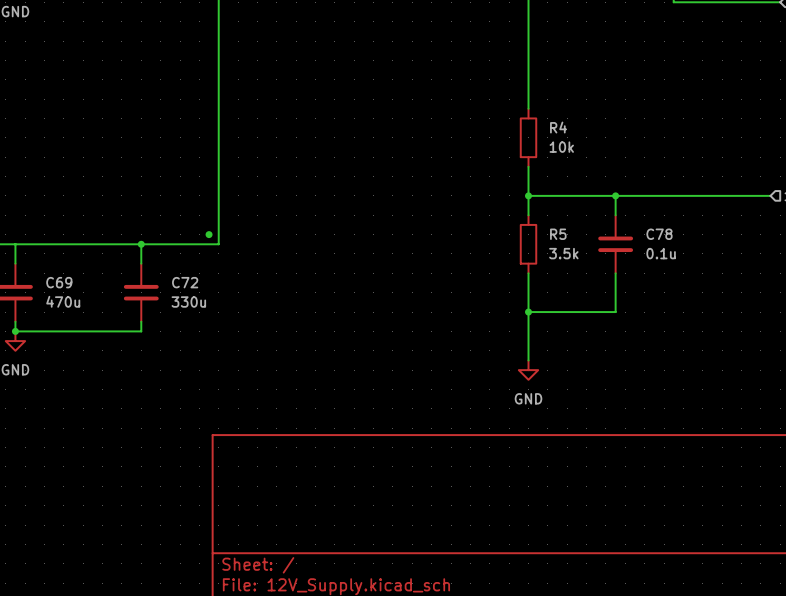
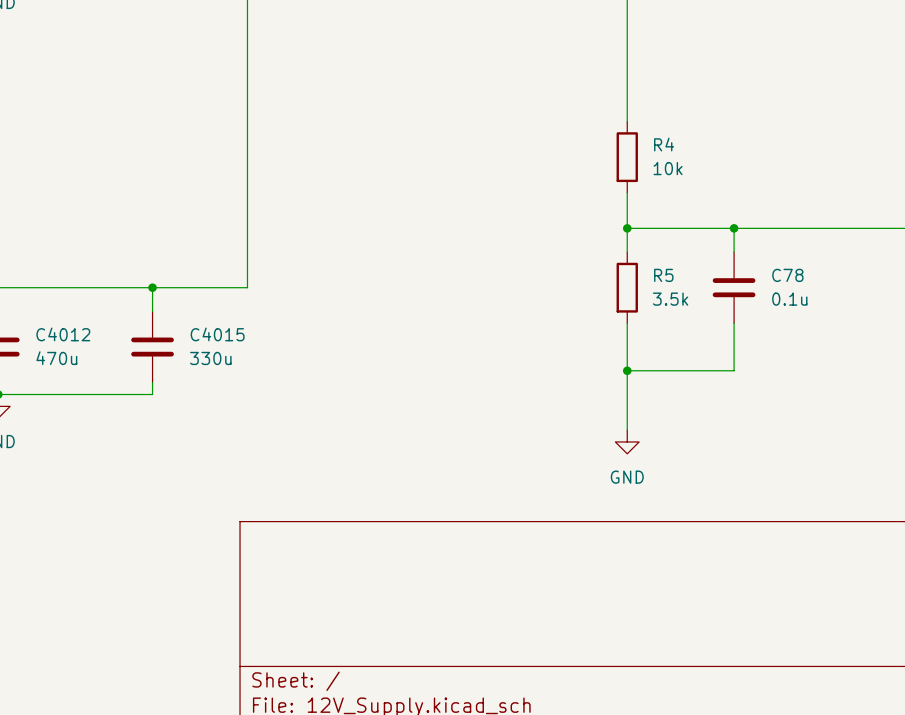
junction: (209, 234) -> none
C69 name: C69 (59, 282) -> C4012 (63, 334)
C72 name: C72 (185, 282) -> C4015 (217, 334)

